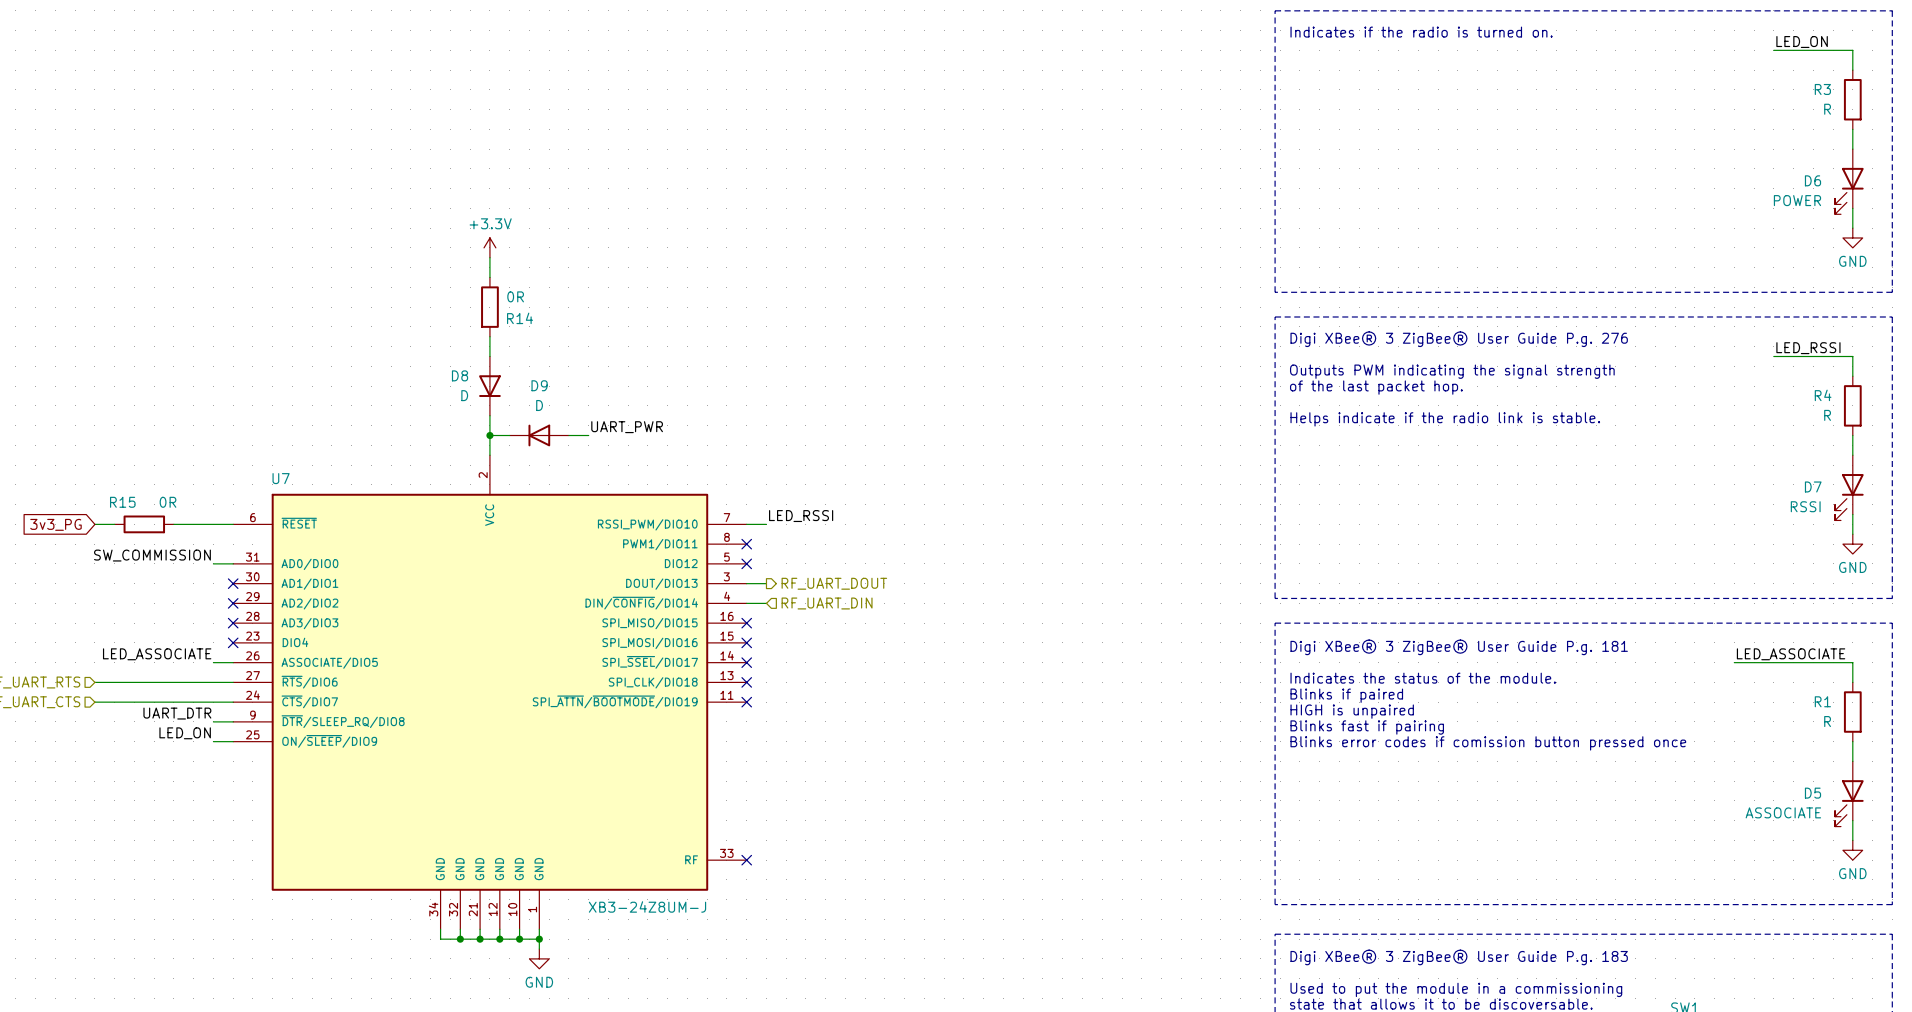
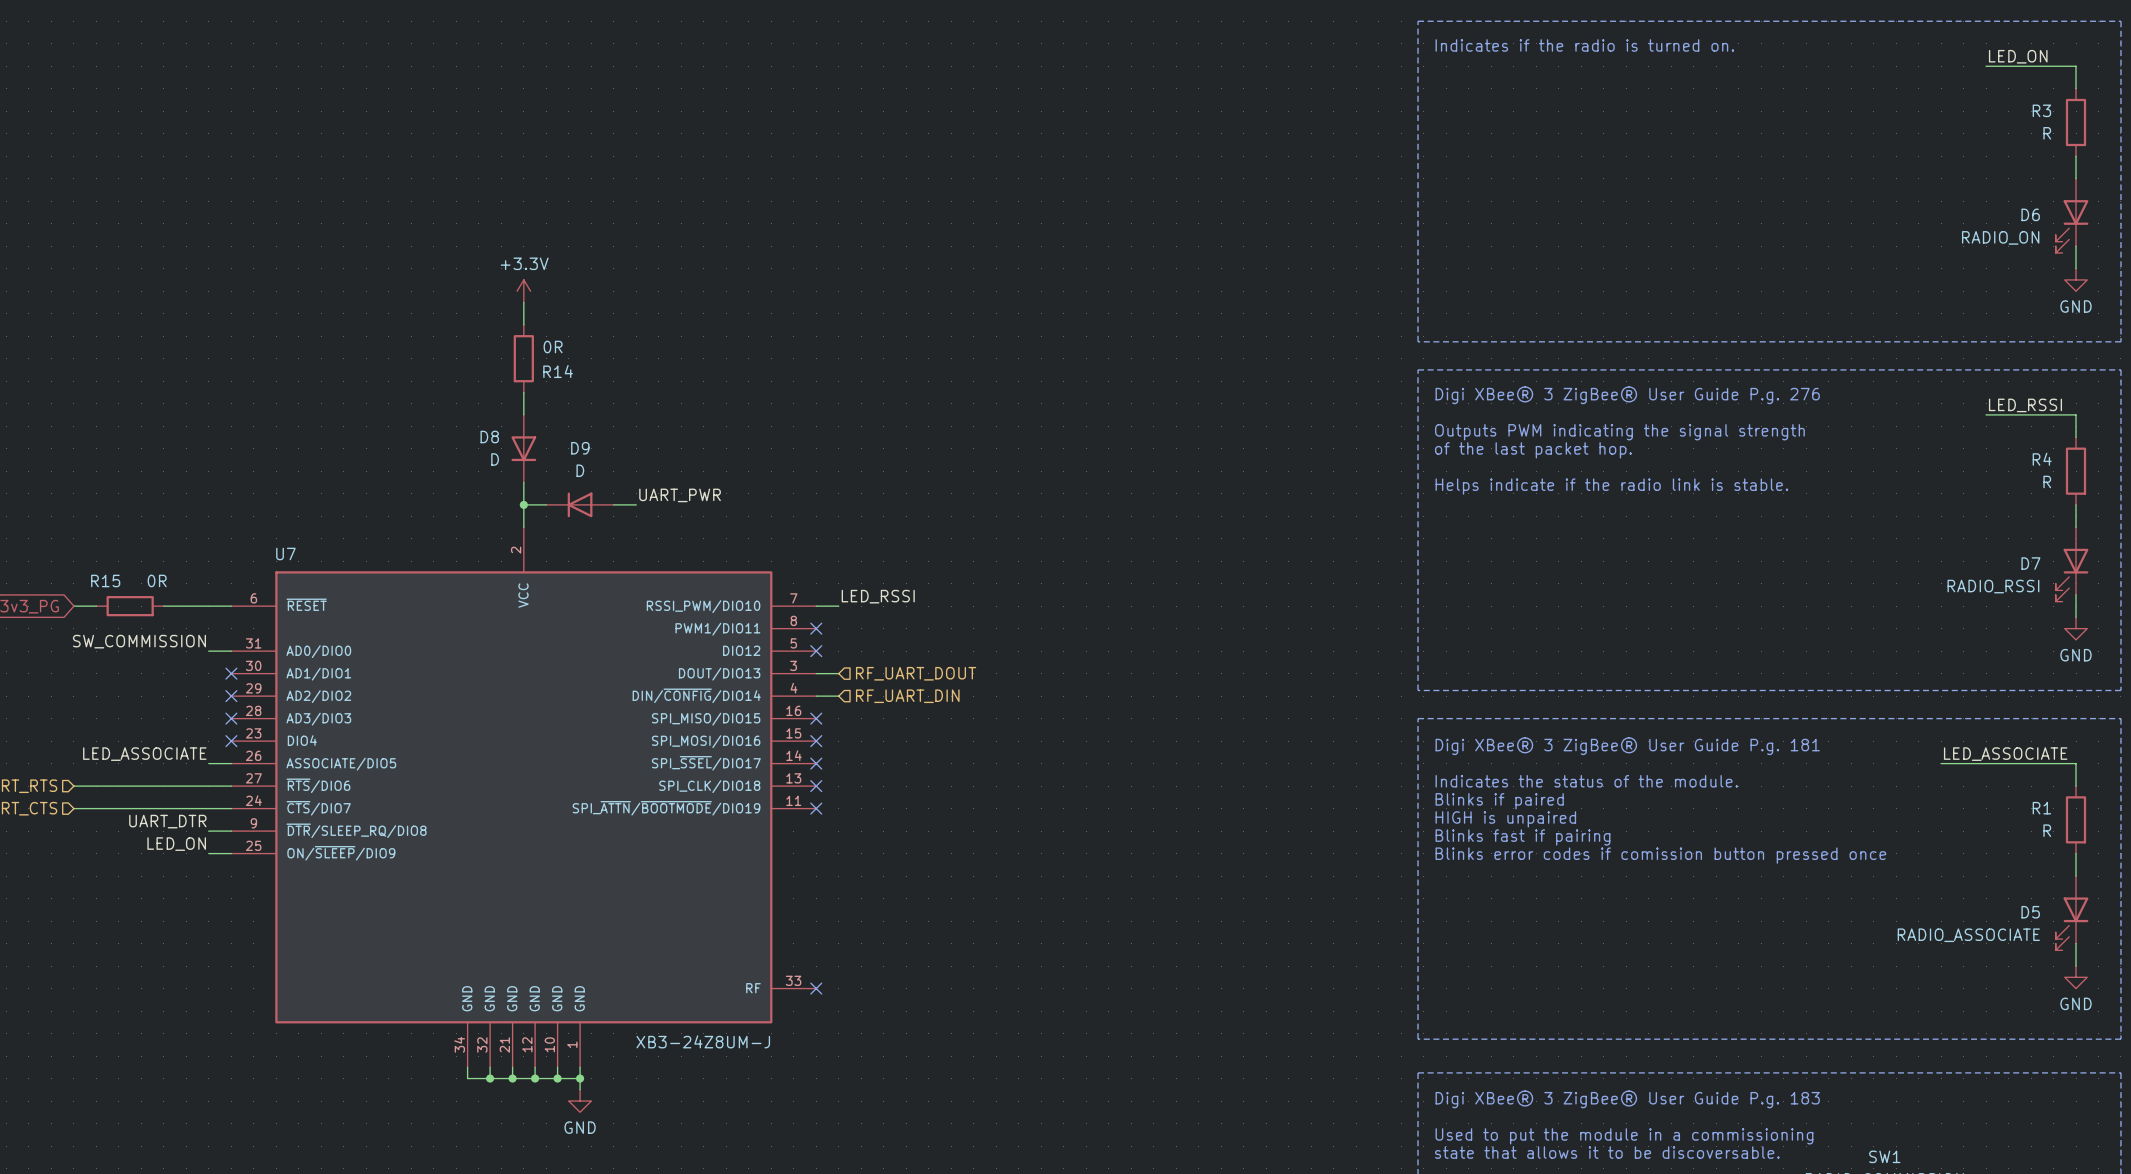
D6 value: POWER (1797, 200) -> RADIO_ON (2000, 237)
D7 value: RSSI (1805, 506) -> RADIO_RSSI (1993, 586)
hierarchical label shape: output (834, 583) -> input (916, 673)
D5 value: ASSOCIATE (1783, 812) -> RADIO_ASSOCIATE (1968, 935)

